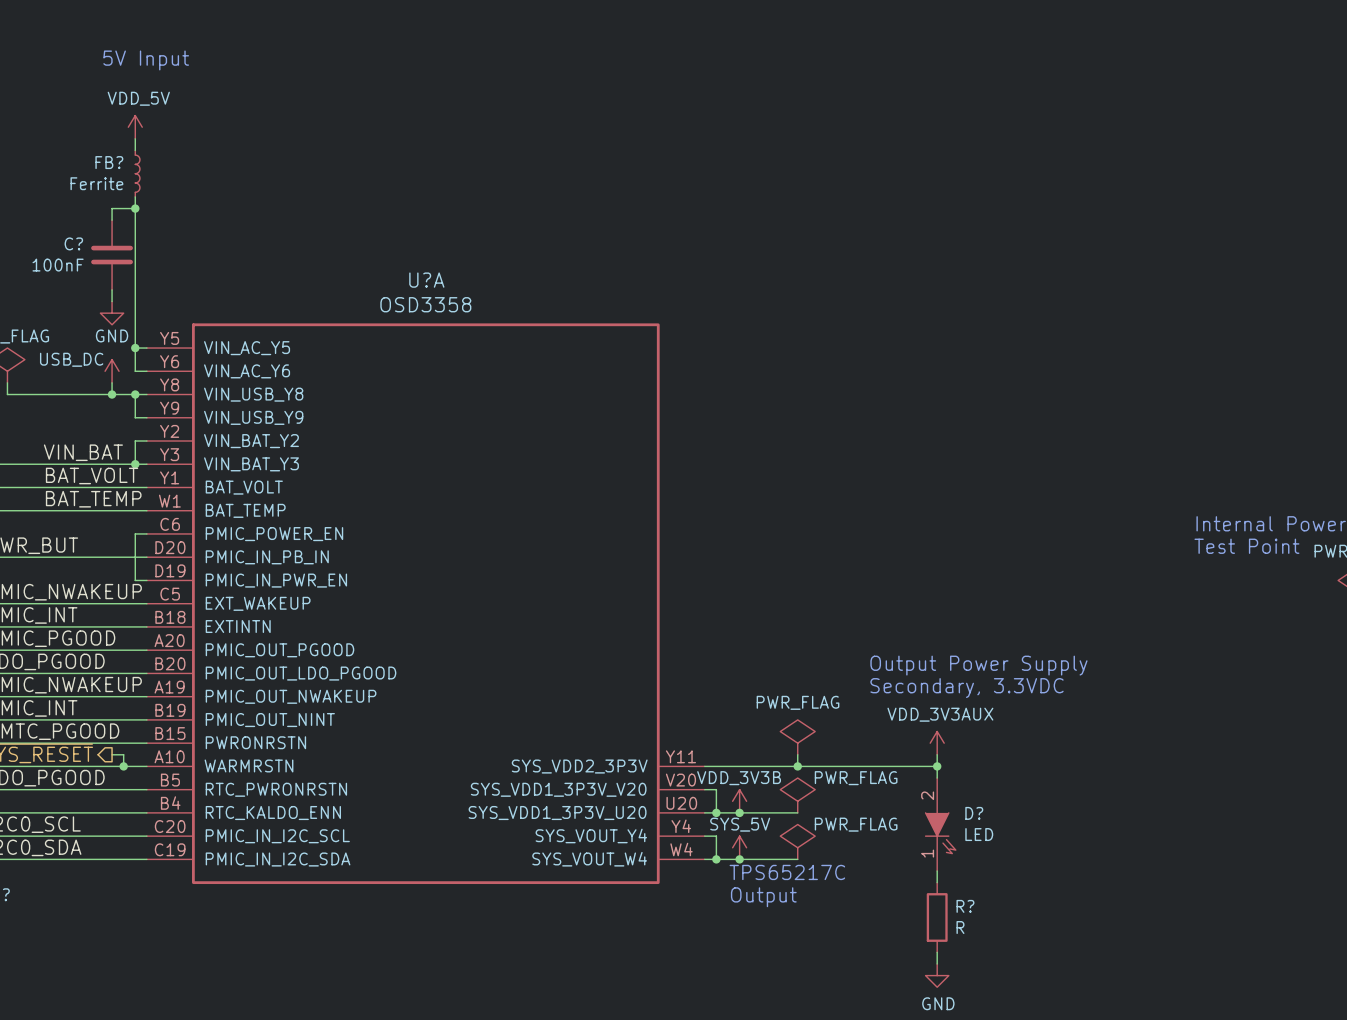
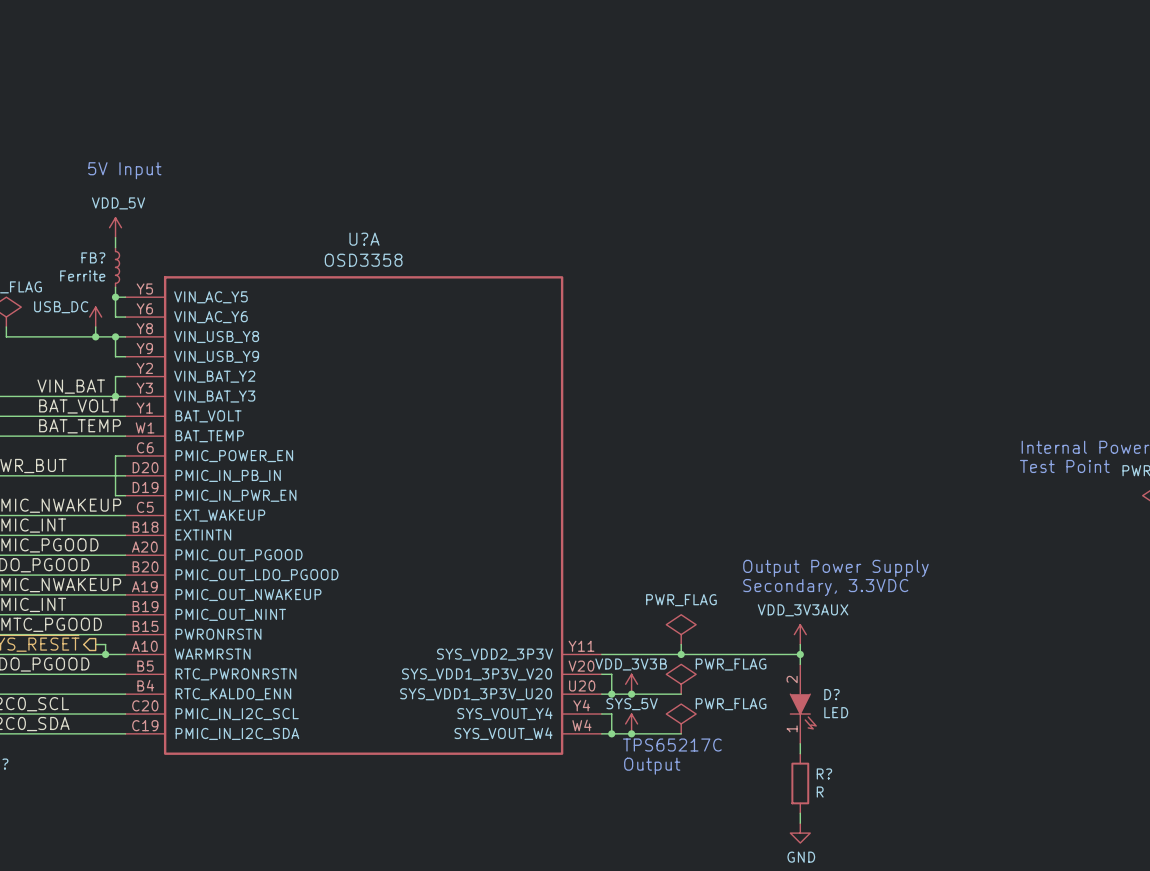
text position: 5V Input (146, 60) -> 5V Input (124, 170)
power symbol position: VDD_5V (135, 127) -> VDD_5V (115, 227)
wire: (135, 138) (135, 150) -> none
FB? position: (137, 173) -> (117, 267)
wire: (135, 196) (135, 278) -> none
wire: (135, 208) (112, 208) (112, 220) -> none
junction: (135, 208) -> none
C?: 100nF (112, 255) -> none
wire: (112, 289) (112, 301) -> none
wire: (135, 289) (135, 336) -> none
power symbol: GND (112, 313) -> none

